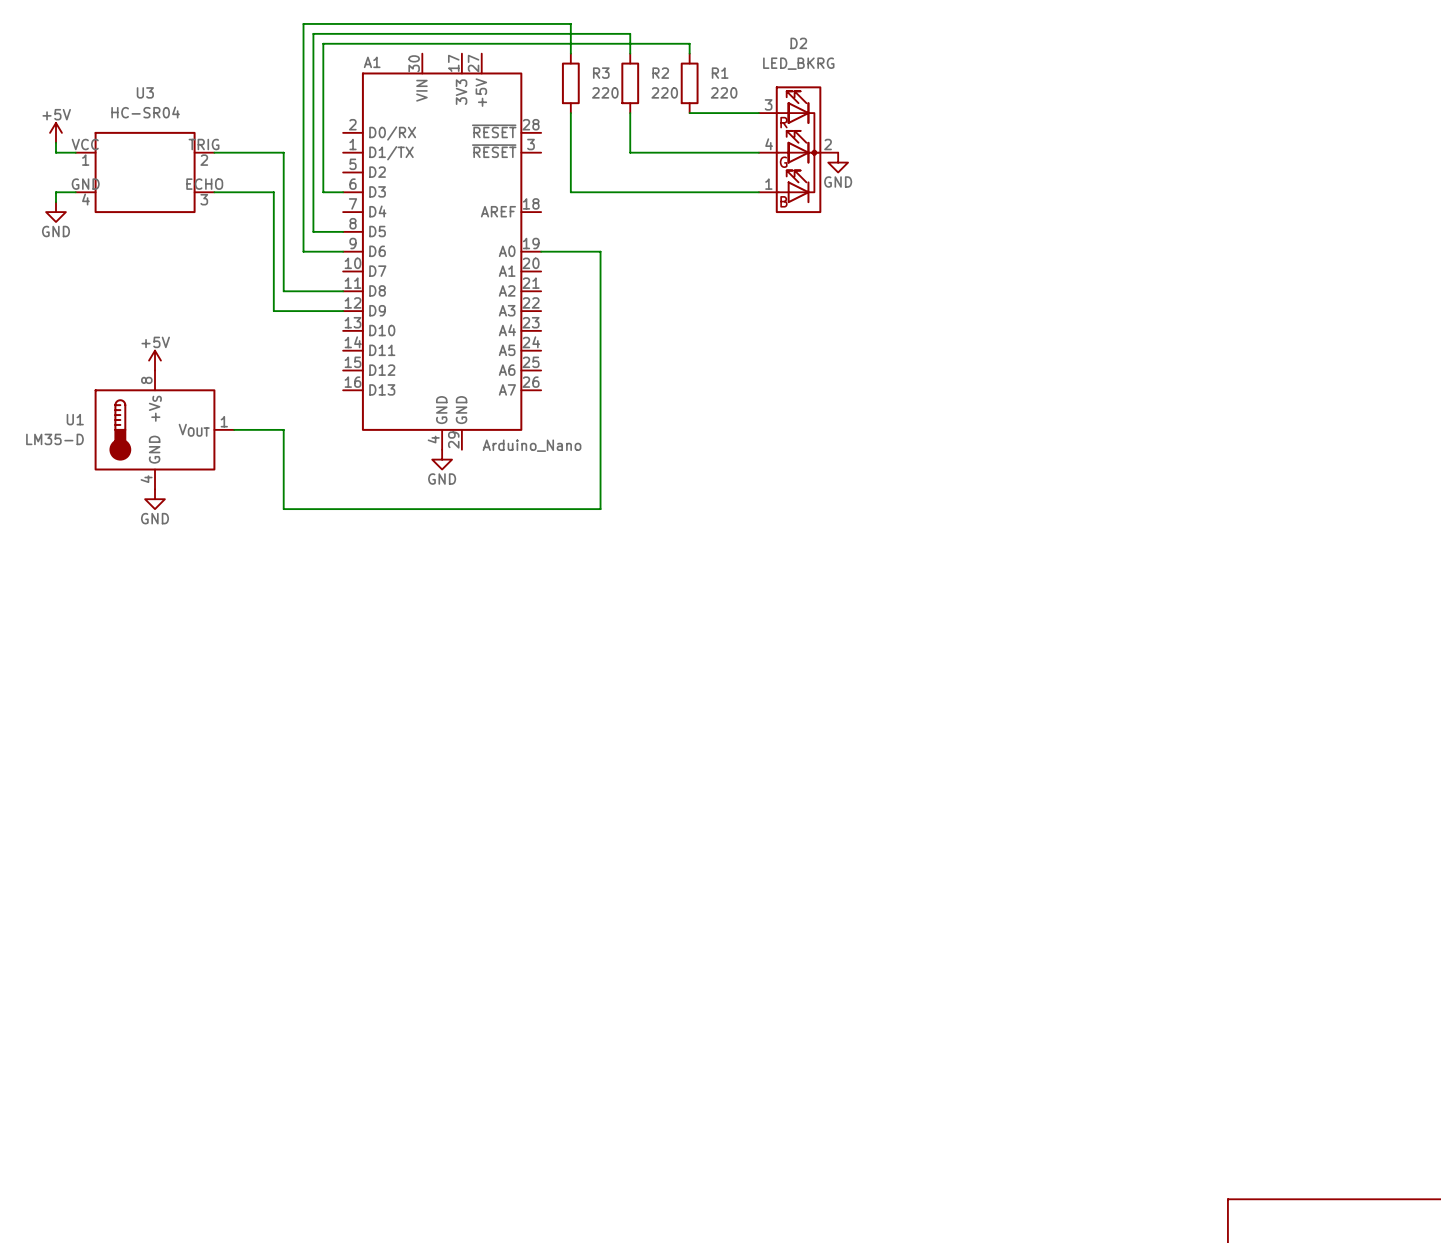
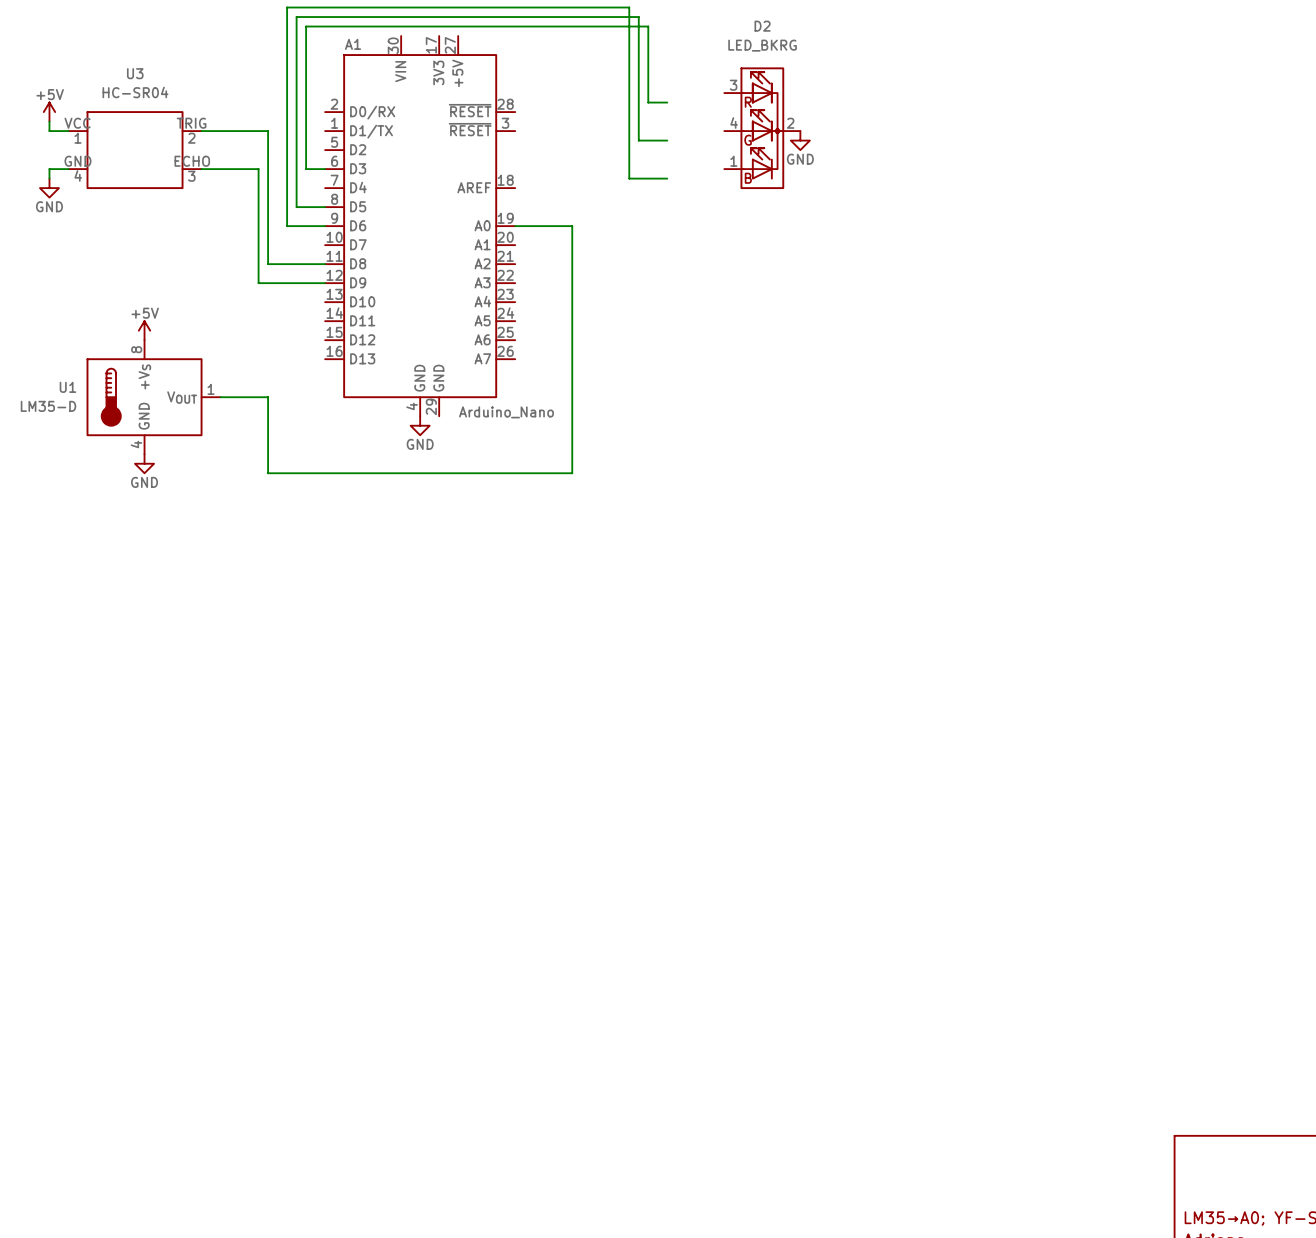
wire: (570, 23) (570, 53) -> (543, 7) (629, 7) (629, 178) (667, 178)
wire: (630, 33) (630, 53) -> (600, 17) (638, 17) (638, 140) (667, 140)
wire: (679, 43) (689, 43) (689, 53) -> (648, 26) (648, 102) (667, 102)
R3: 220 (570, 83) -> none
R2: 220 (630, 83) -> none
R1: 220 (689, 83) -> none
wire: (570, 113) (570, 192) (758, 192) -> none
wire: (630, 113) (630, 152) (758, 152) -> none
wire: (689, 113) (758, 113) -> none

